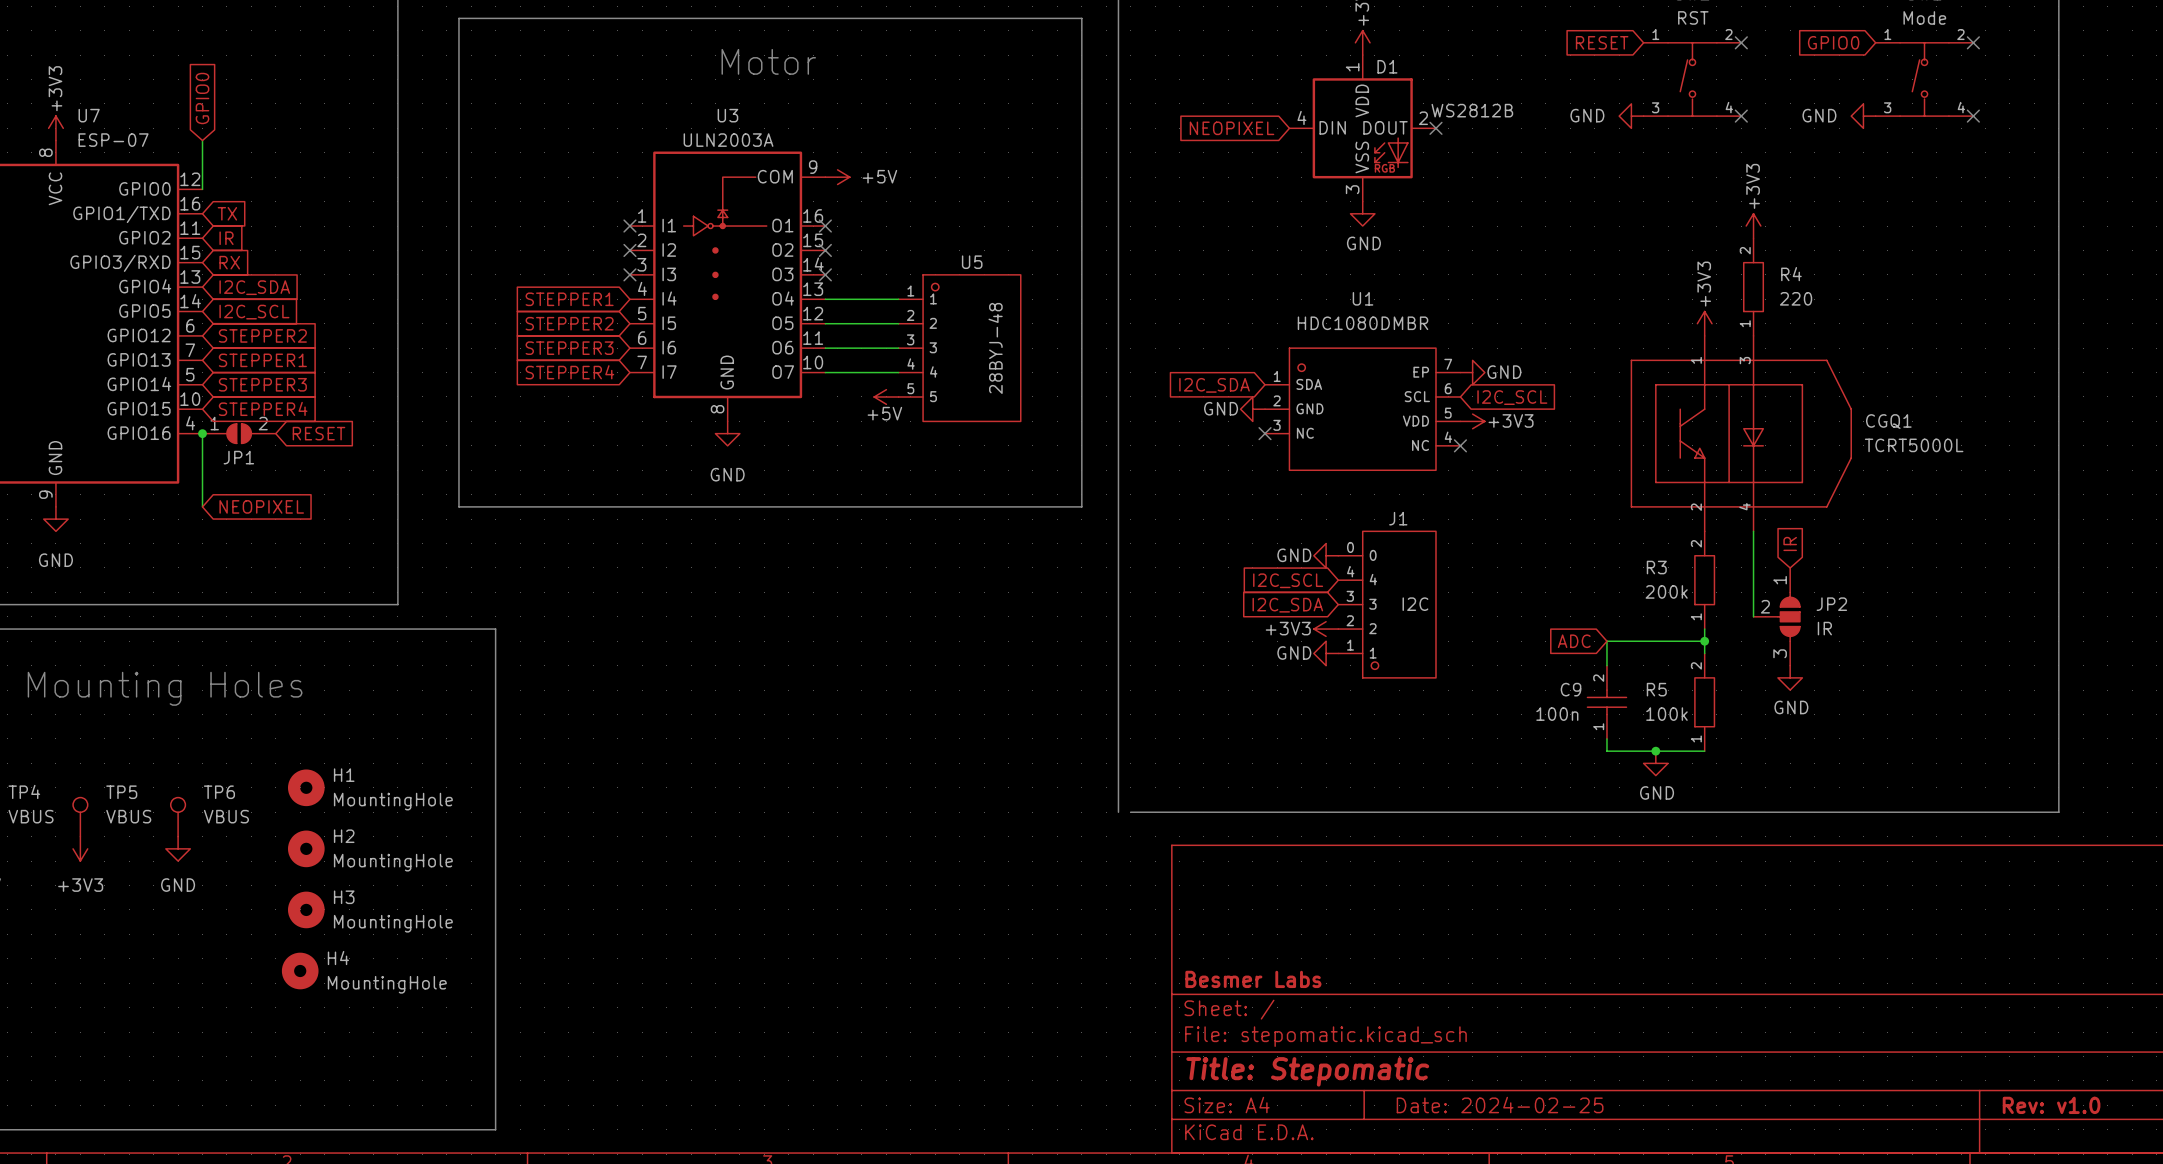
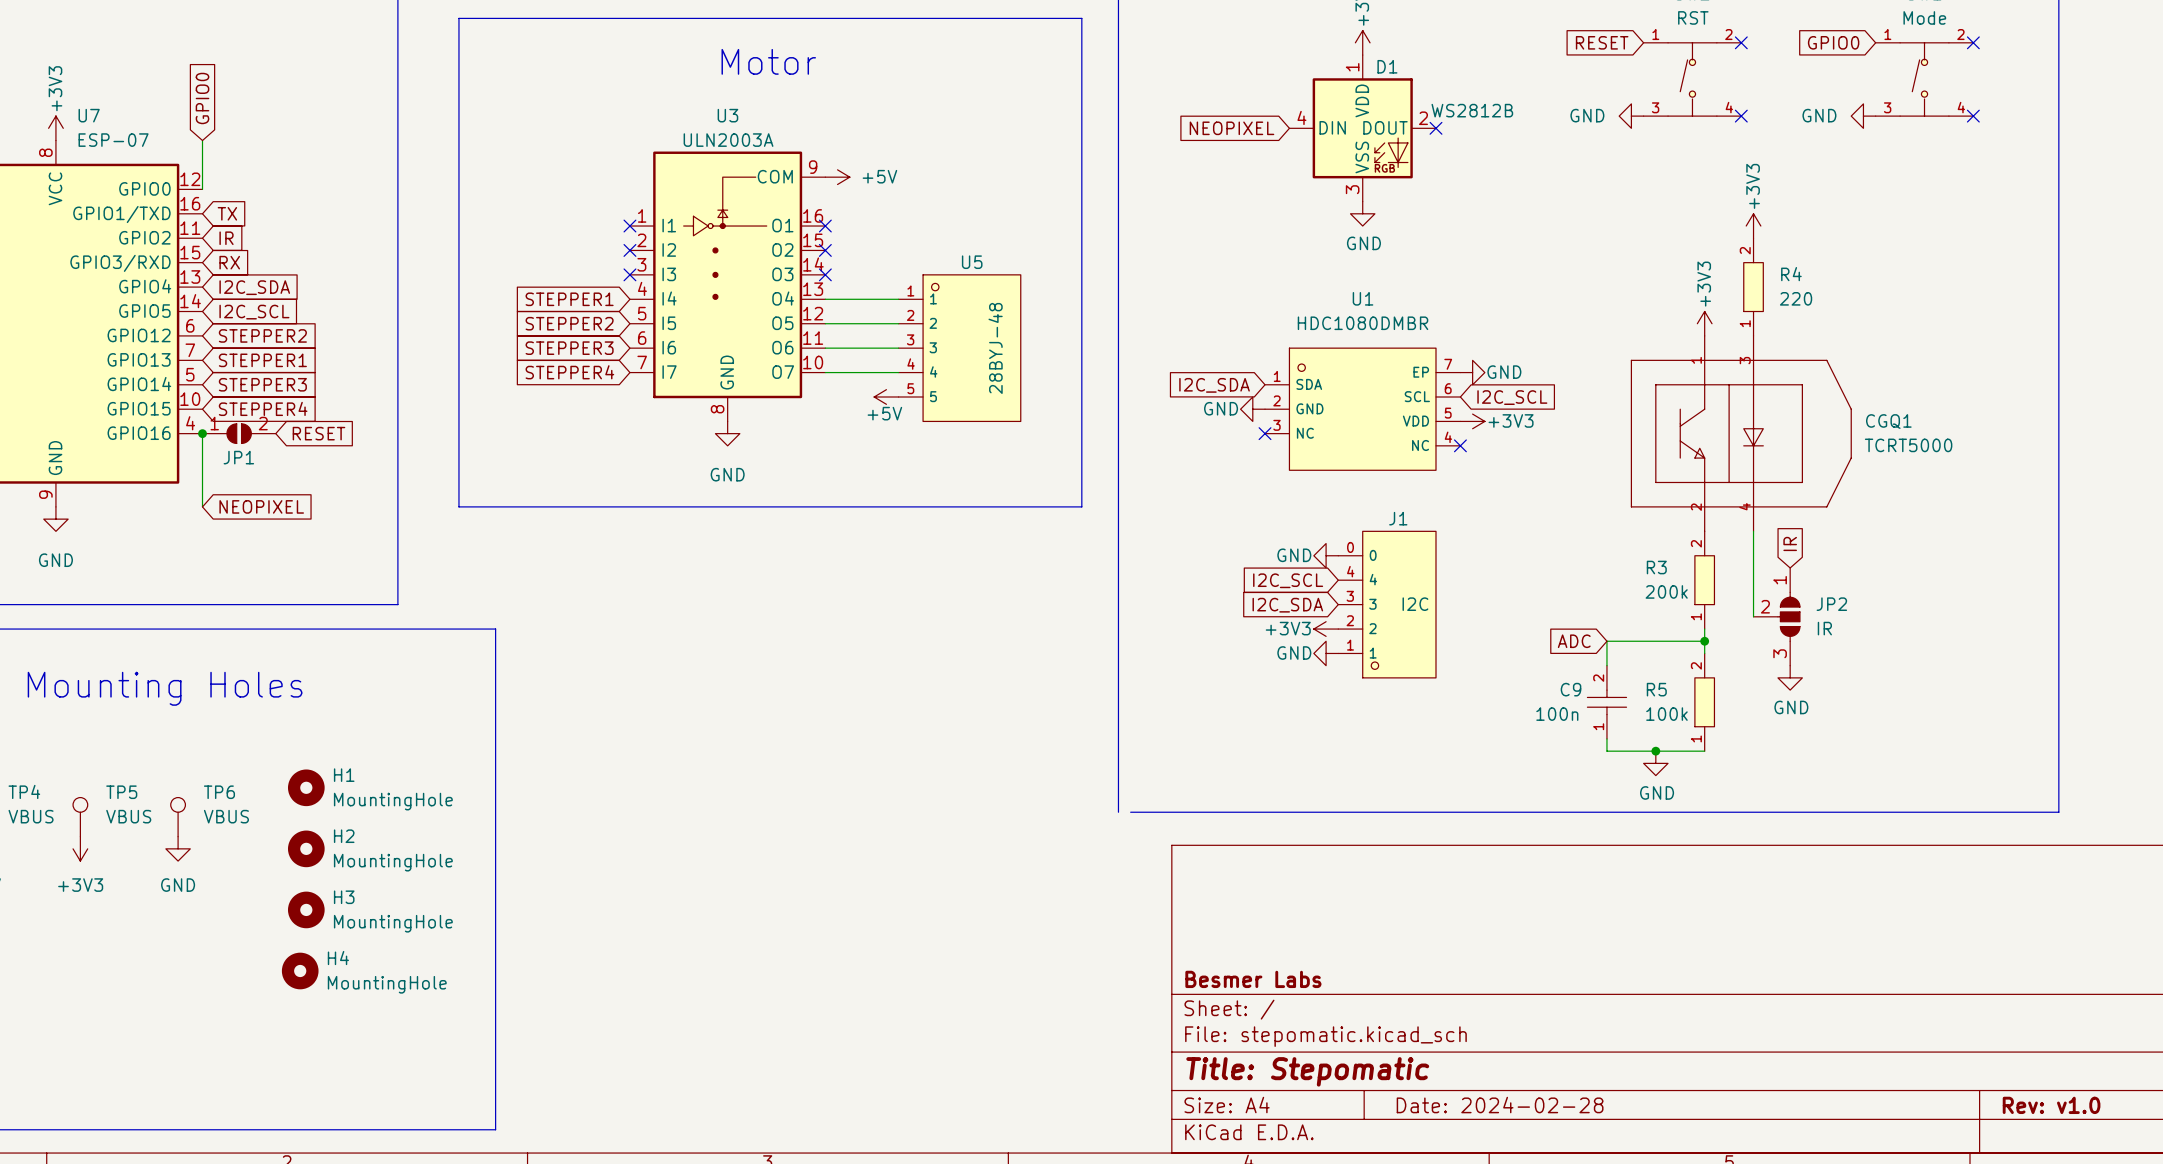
CGQ1 value: TCRT5000L (1914, 445) -> TCRT5000 (1908, 445)
title block: Date: 2024-02-25 (1500, 1105) -> Date: 2024-02-28 (1500, 1105)

